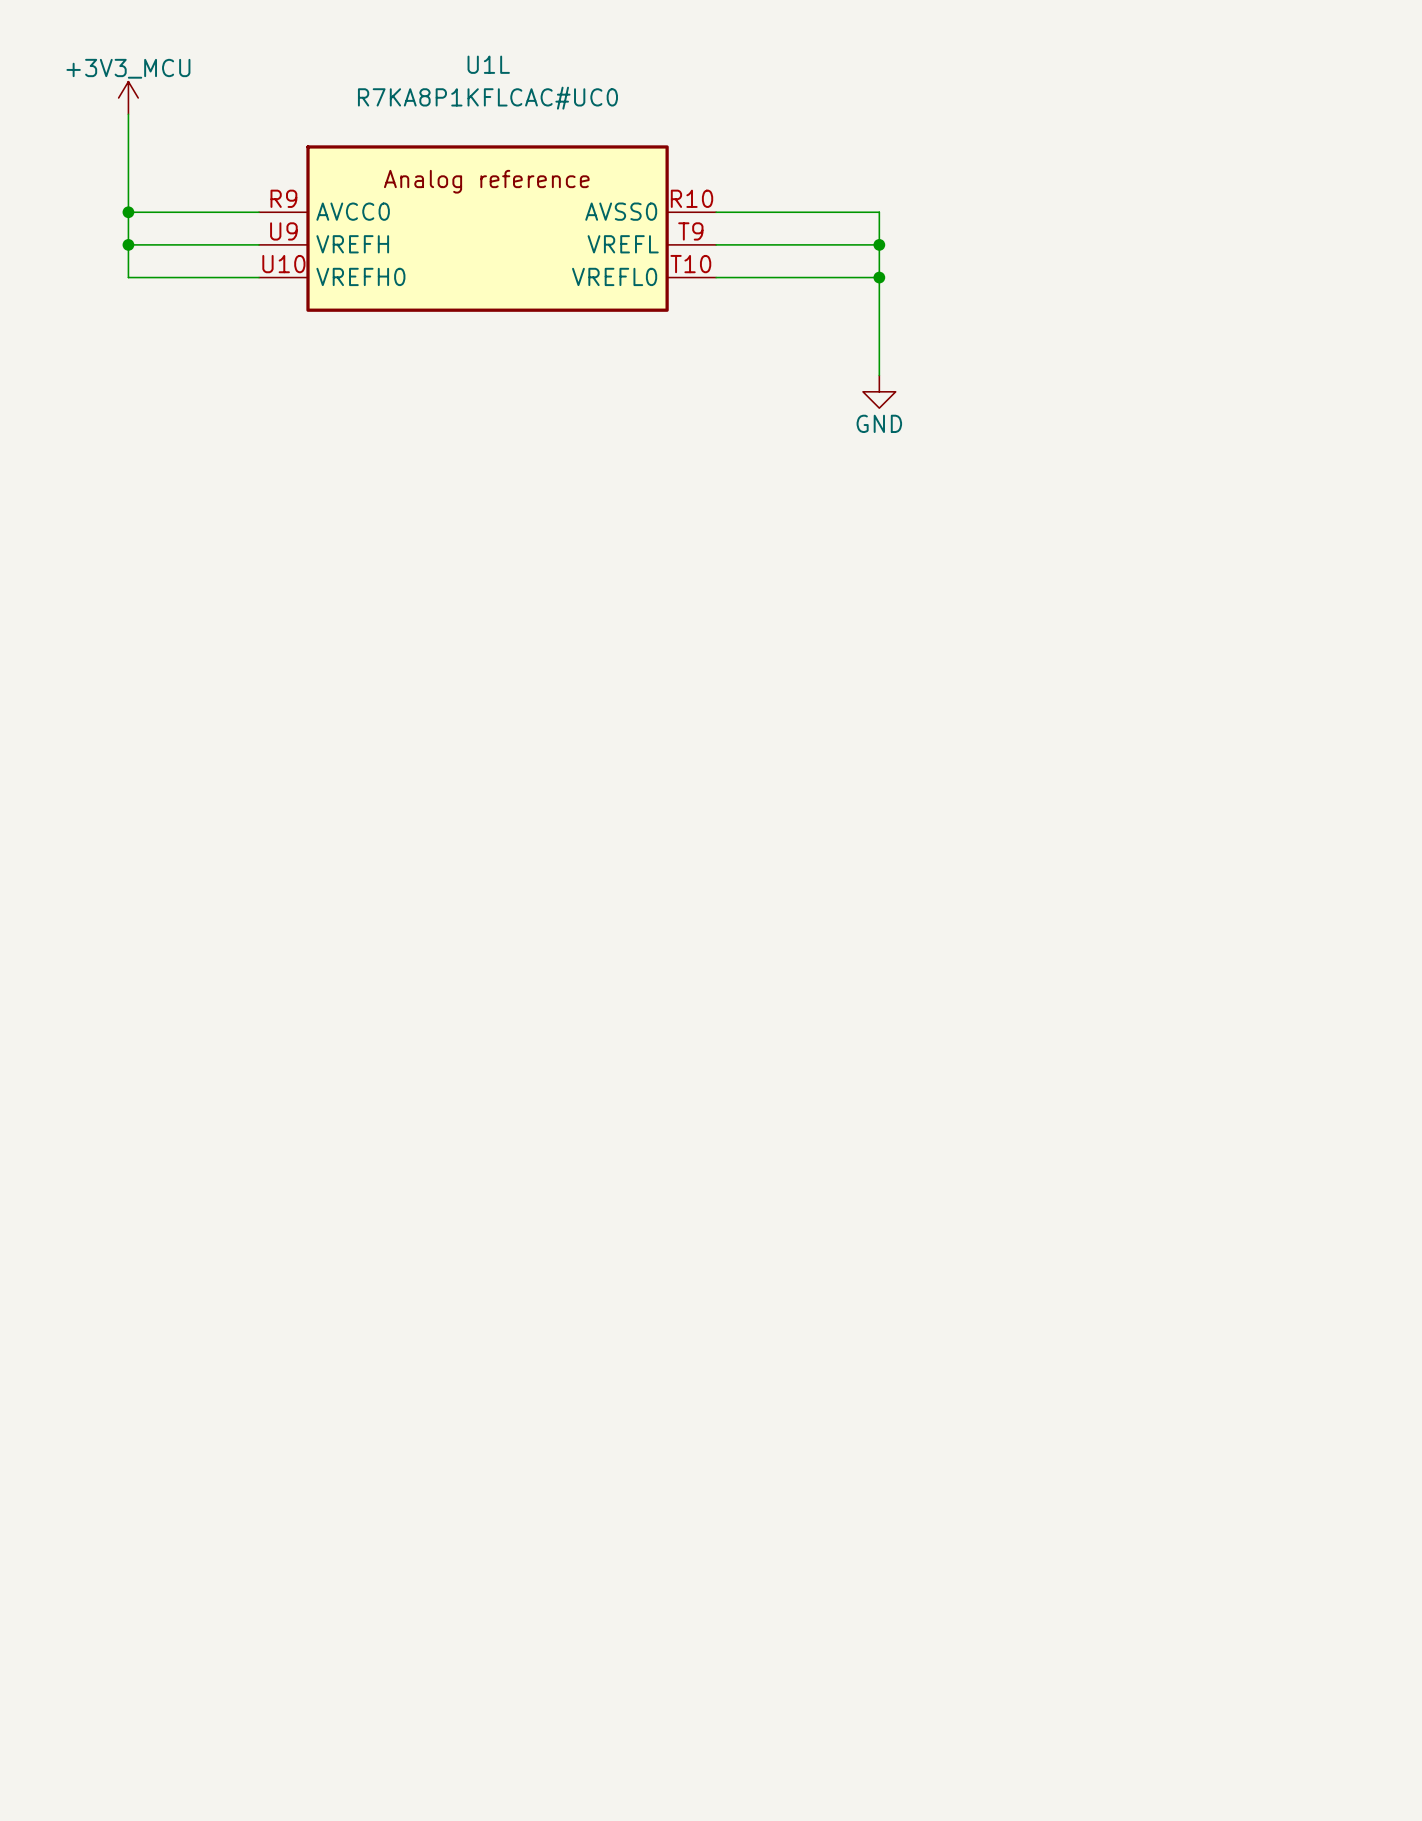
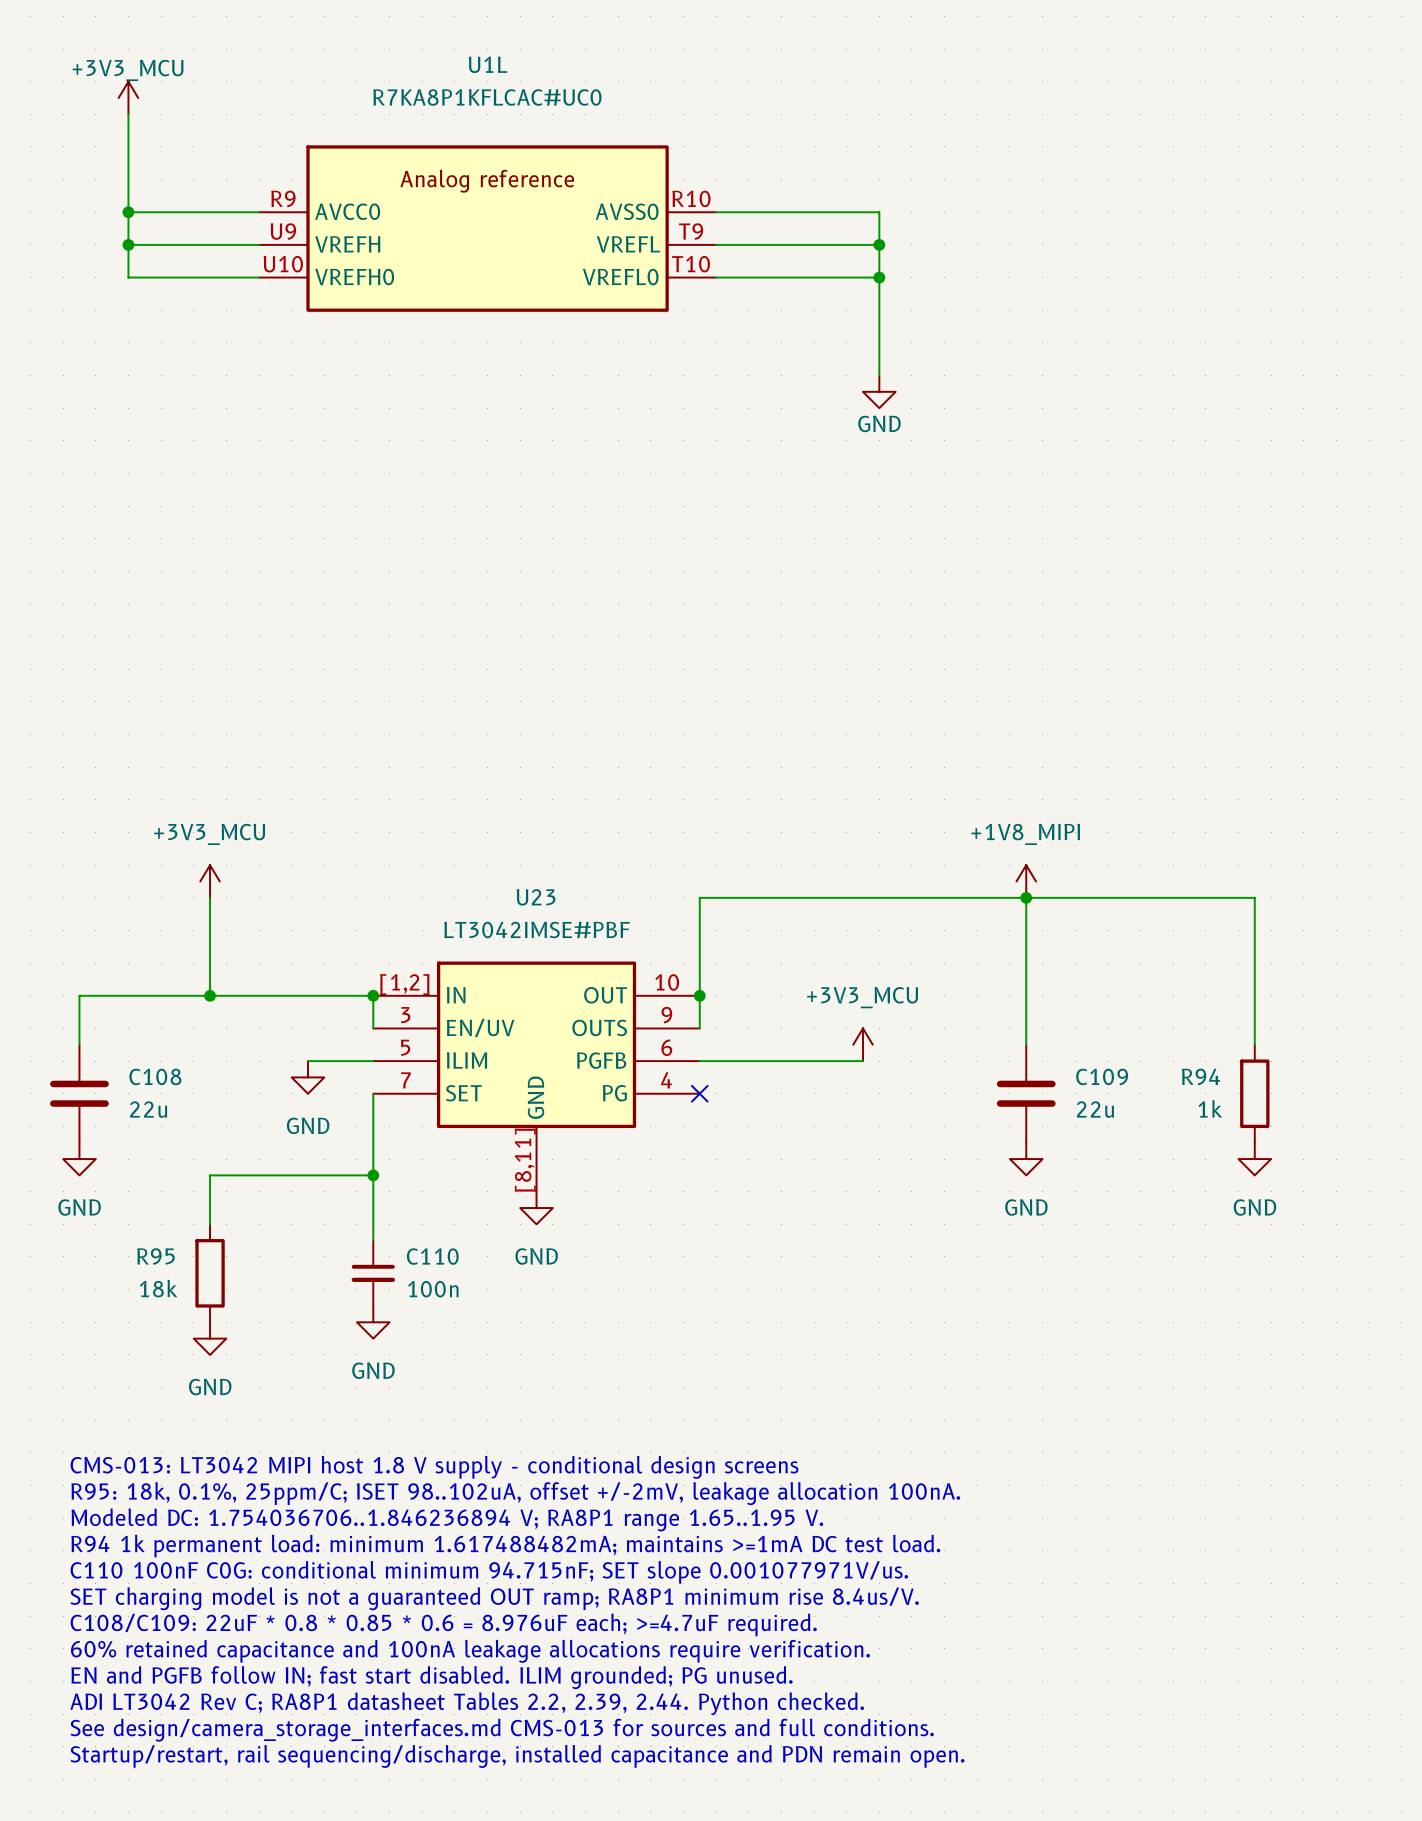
power symbol: none -> +3V3_MCU (210, 881)
power symbol: none -> +1V8_MIPI (1026, 881)
wire: none -> (210, 897) (210, 995)
wire: none -> (1026, 897) (1026, 1044)
junction: none -> (1026, 897)
junction: none -> (210, 995)
junction: none -> (373, 995)
junction: none -> (699, 995)
wire: none -> (373, 1028) (373, 995) (79, 995) (79, 1044)
wire: none -> (699, 1028) (699, 897) (1254, 897) (1254, 1044)
power symbol: none -> +3V3_MCU (863, 1044)
wire: none -> (307, 1061) (373, 1061)
wire: none -> (699, 1061) (863, 1061)
U23: none -> LT3042IMSE#PBF (536, 1076)
power symbol: none -> GND (307, 1077)
C108: none -> 22u (79, 1093)
wire: none -> (373, 1093) (373, 1240)
no-connect mark: none -> (699, 1093)
C109: none -> 22u (1026, 1093)
R94: none -> 1k (1254, 1093)
power symbol: none -> GND (79, 1159)
power symbol: none -> GND (1026, 1159)
power symbol: none -> GND (1254, 1159)
wire: none -> (373, 1175) (210, 1175) (210, 1224)
junction: none -> (373, 1175)
power symbol: none -> GND (536, 1208)
R95: none -> 18k (210, 1273)
C110: none -> 100n (373, 1273)
power symbol: none -> GND (373, 1322)
power symbol: none -> GND (210, 1338)
text: none -> CMS-013: LT3042 MIPI host 1.8 V supply - conditional design screens (434, 1467)
text: none -> R95: 18k, 0.1%, 25ppm/C; ISET 98..102uA, offset +/-2mV, leakage allocation 100nA. (515, 1493)
text: none -> Modeled DC: 1.754036706..1.846236894 V; RA8P1 range 1.65..1.95 V. (447, 1519)
text: none -> R94 1k permanent load: minimum 1.617488482mA; maintains >=1mA DC test load. (505, 1546)
text: none -> C110 100nF C0G: conditional minimum 94.715nF; SET slope 0.001077971V/us. (489, 1572)
text: none -> SET charging model is not a guaranteed OUT ramp; RA8P1 minimum rise 8.4us/V. (494, 1598)
text: none -> C108/C109: 22uF * 0.8 * 0.85 * 0.6 = 8.976uF each; >=4.7uF required. (443, 1624)
text: none -> 60% retained capacitance and 100nA leakage allocations require verification. (470, 1651)
text: none -> EN and PGFB follow IN; fast start disabled. ILIM grounded; PG unused. (431, 1677)
text: none -> ADI LT3042 Rev C; RA8P1 datasheet Tables 2.2, 2.39, 2.44. Python checked. (467, 1703)
text: none -> See design/camera_storage_interfaces.md CMS-013 for sources and full conditions. (502, 1730)
text: none -> Startup/restart, rail sequencing/discharge, installed capacitance and PDN remain open. (517, 1756)

